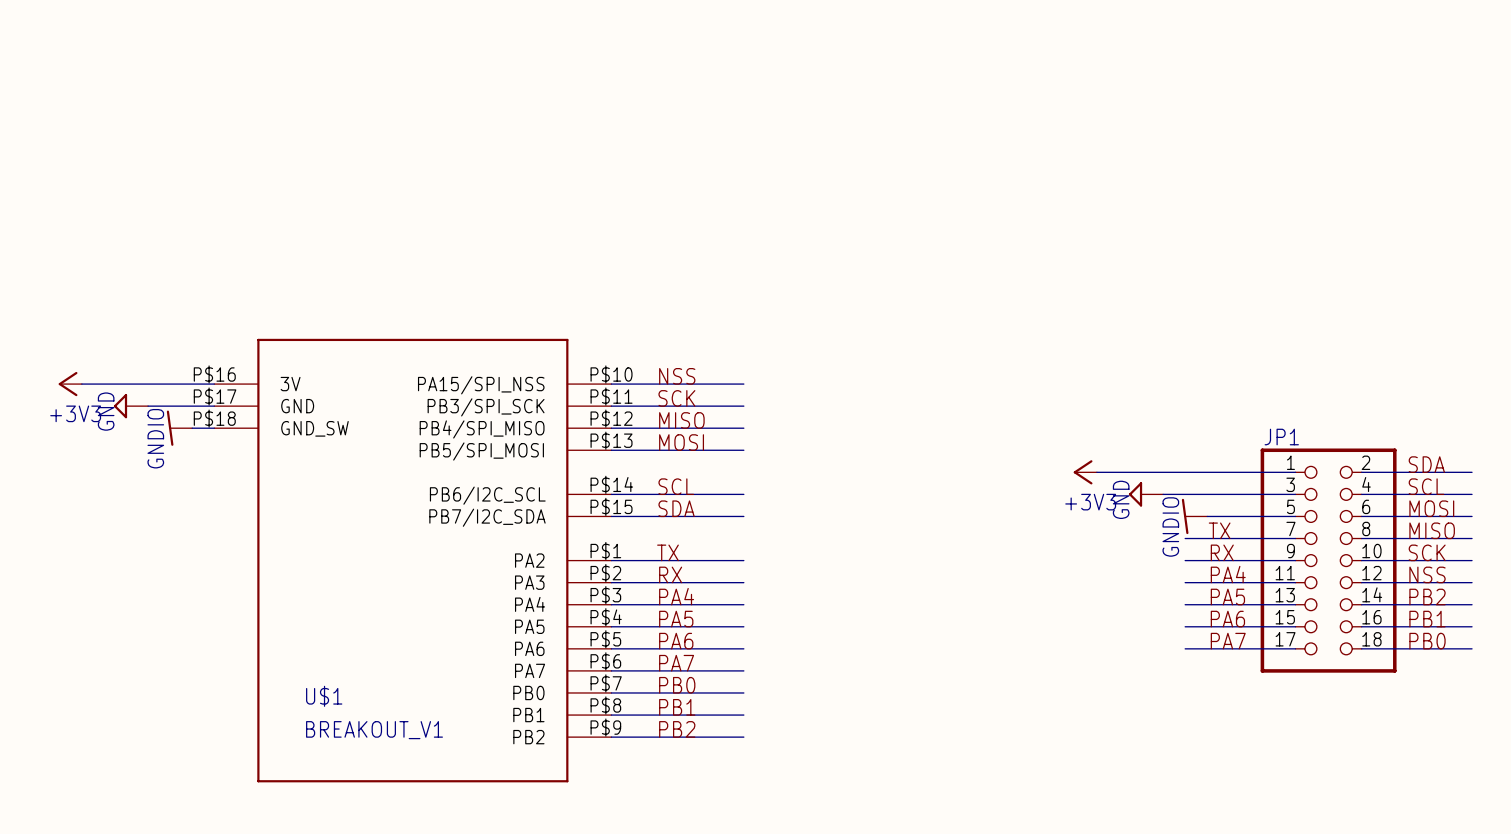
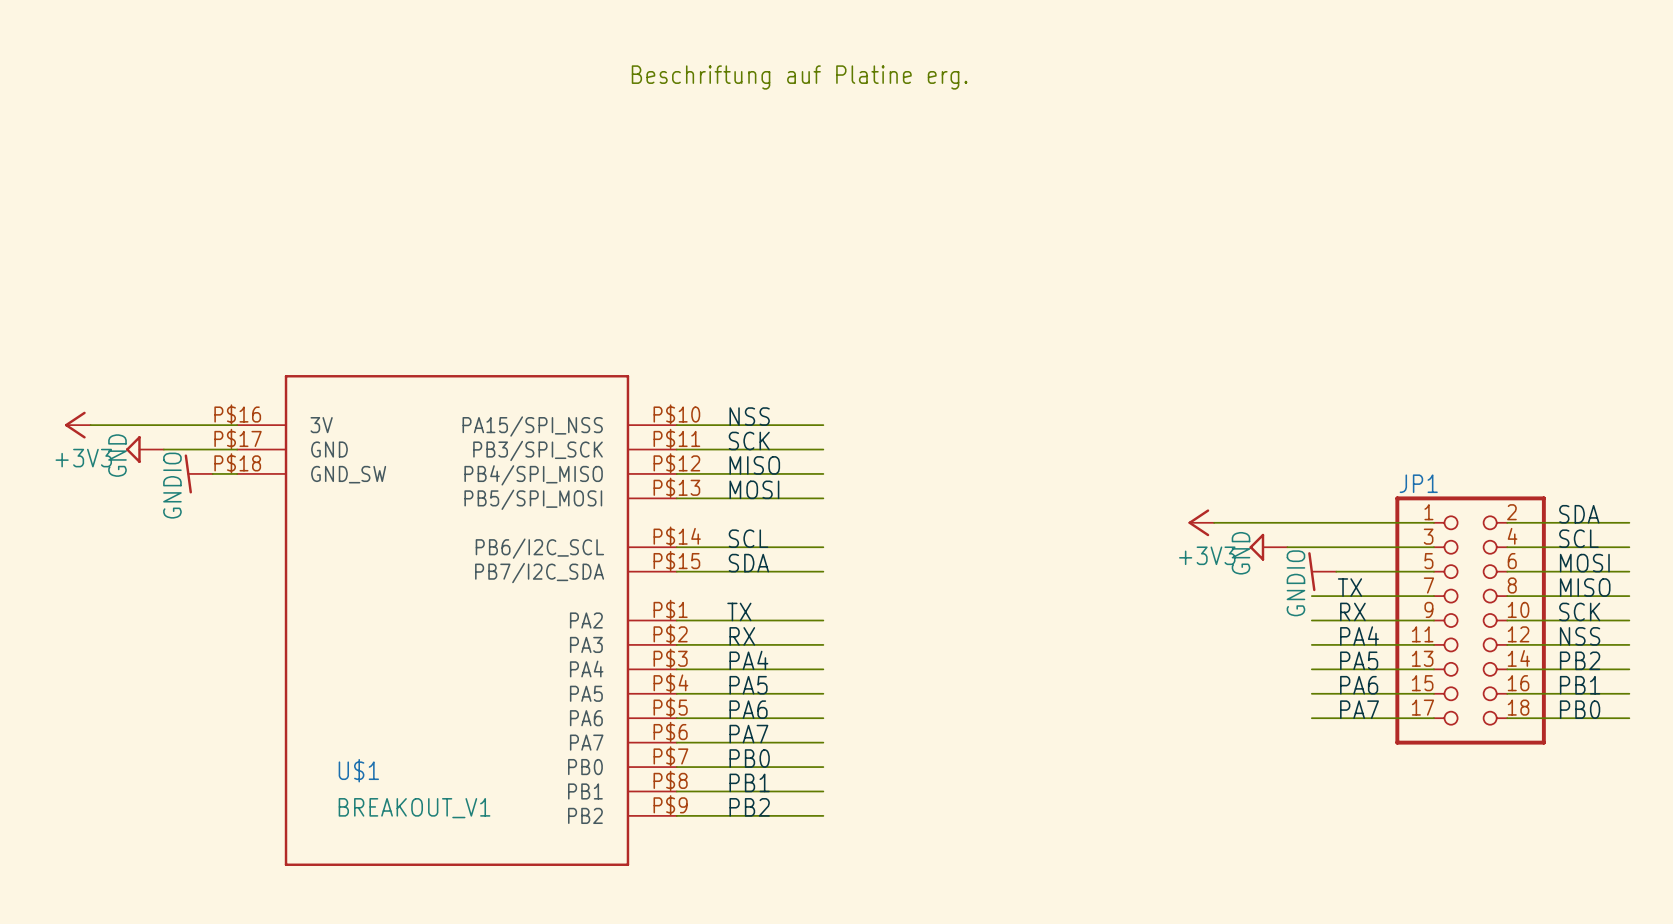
text: none -> Beschriftung auf Platine erg. (799, 77)

